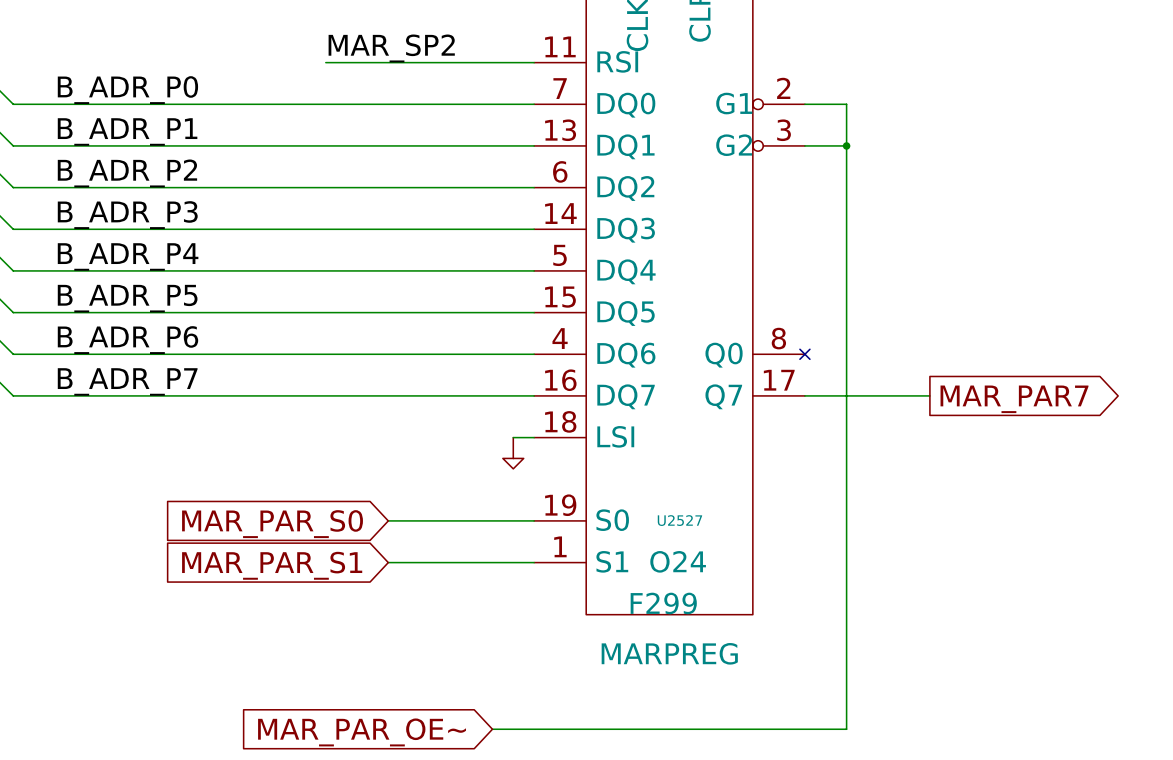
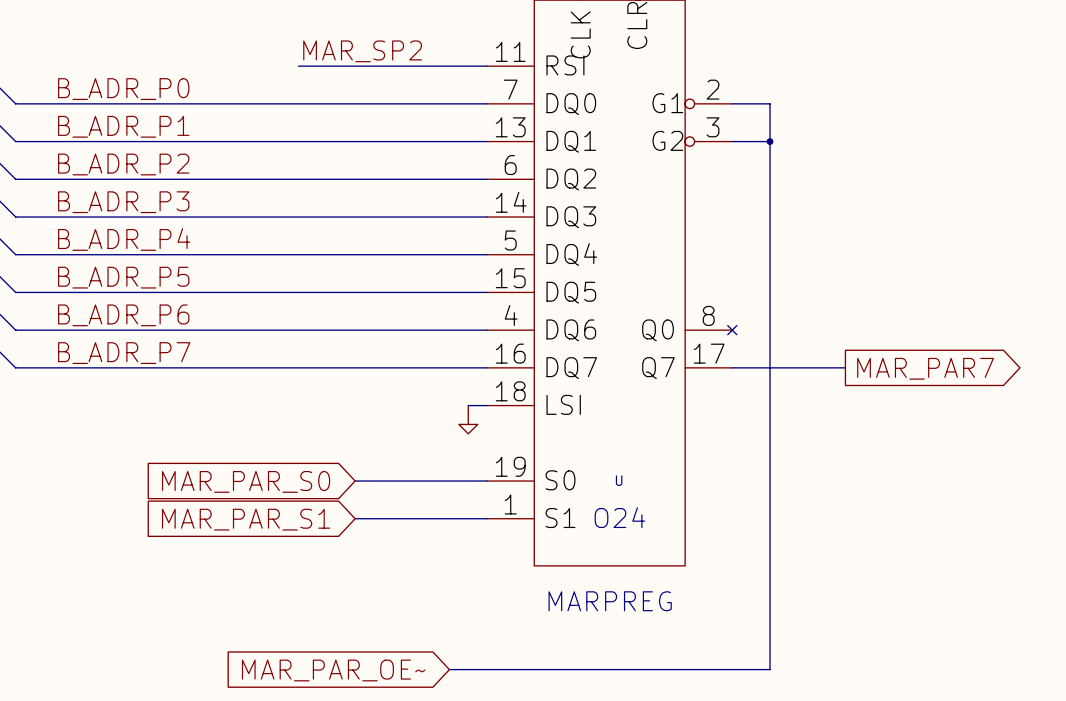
U2527 name: U2527 (679, 520) -> U (619, 480)
U2527 value: F299 (663, 603) -> none

